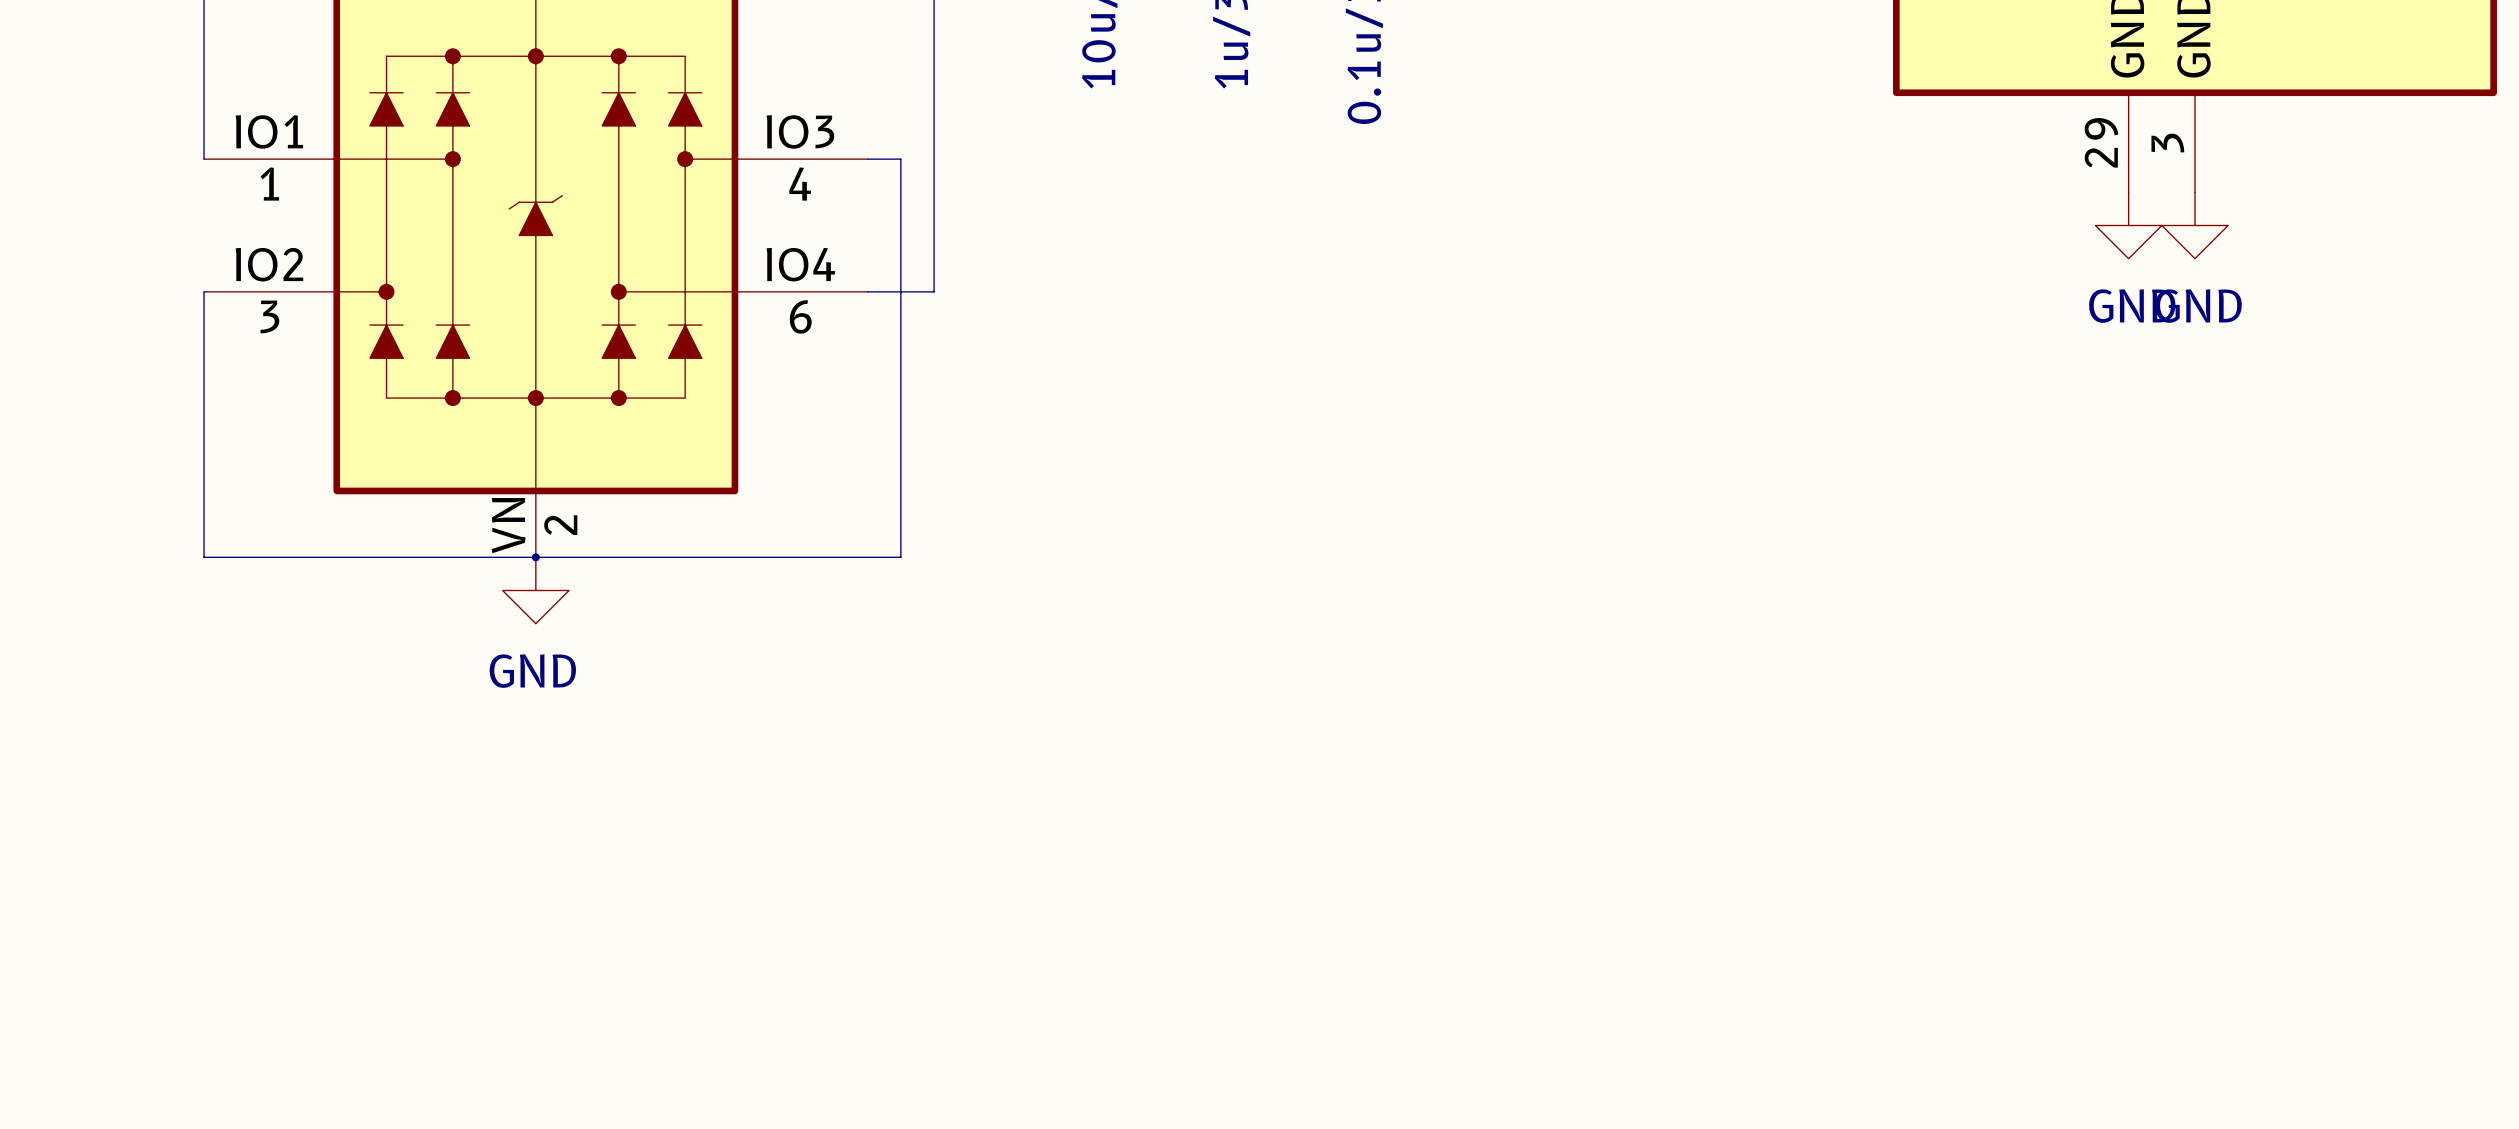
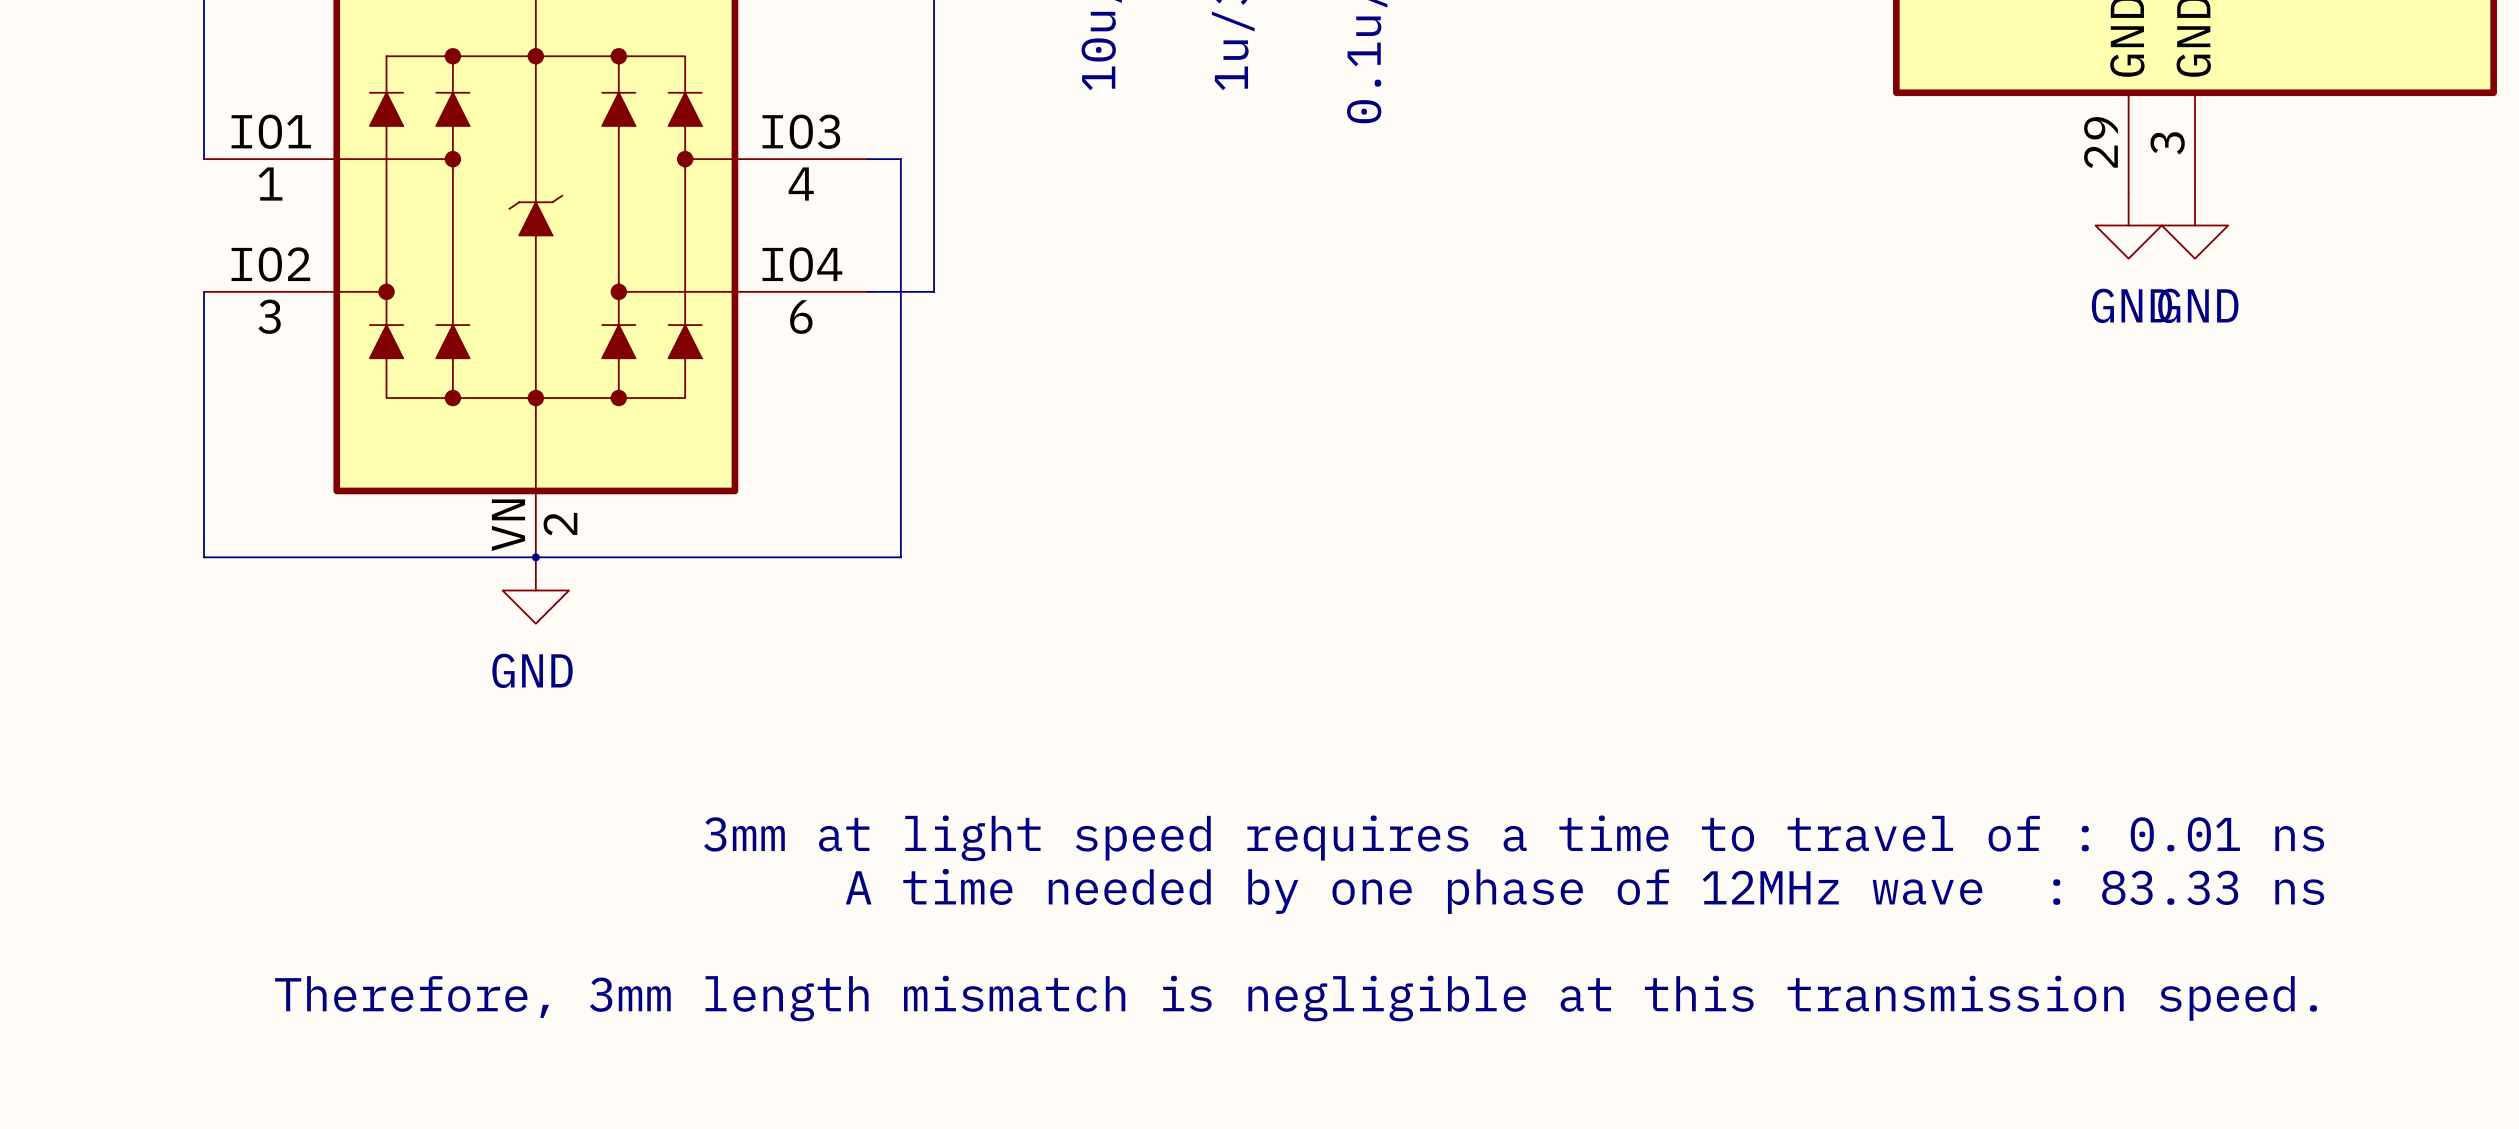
text: none -> 3mm at light speed requires a time to travel of : 0.01 ns (1514, 838)
text: none -> A time needed by one phase of 12MHz wave : 83.33 ns (1585, 891)
text: none -> Therefore, 3mm length mismatch is negligible at this transmission speed. (1296, 998)

